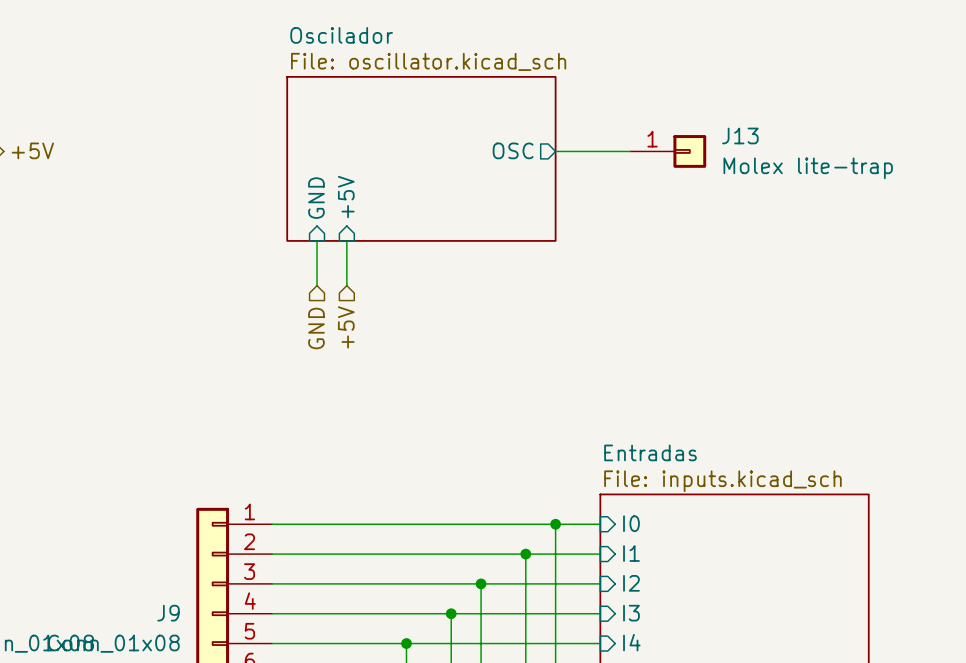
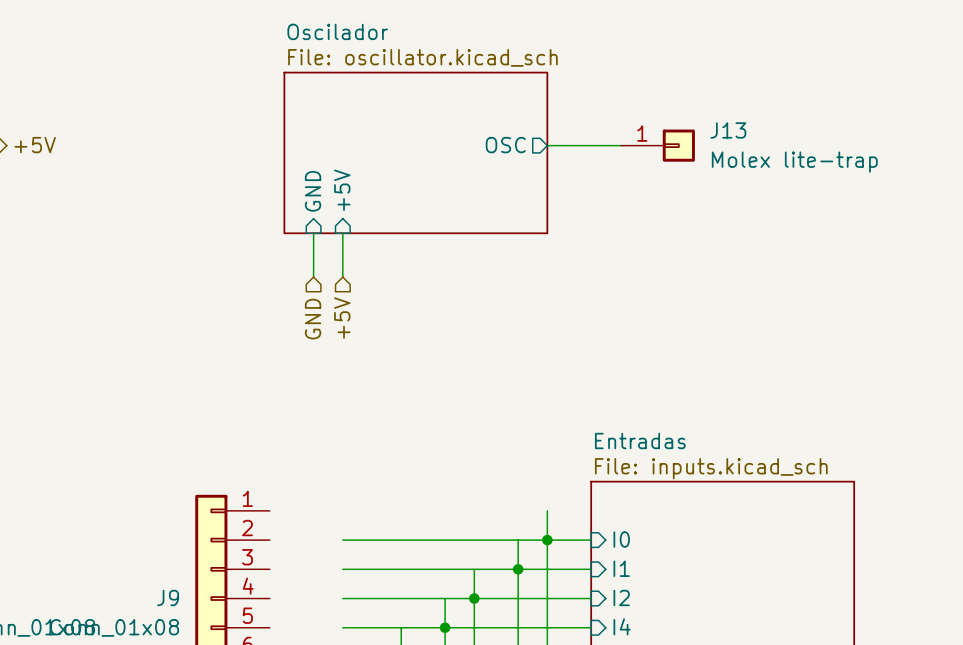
sheet pin: I0 (631, 523) -> none
wire: (272, 524) (600, 524) -> none
junction: (555, 524) -> none
sheet pin: I1 (631, 553) -> I0 (621, 539)
wire: (272, 554) (346, 554) -> none
junction: (525, 554) -> none
junction: none -> (547, 540)
wire: (272, 583) (346, 583) -> none
junction: (481, 583) -> none
junction: none -> (518, 569)
sheet pin: I2 (631, 583) -> I1 (621, 568)
wire: (272, 613) (346, 613) -> none
junction: (451, 613) -> none
junction: none -> (474, 598)
sheet pin: I3 (631, 613) -> I2 (621, 597)
wire: (272, 643) (346, 643) -> none
junction: (406, 643) -> none
junction: none -> (445, 627)

